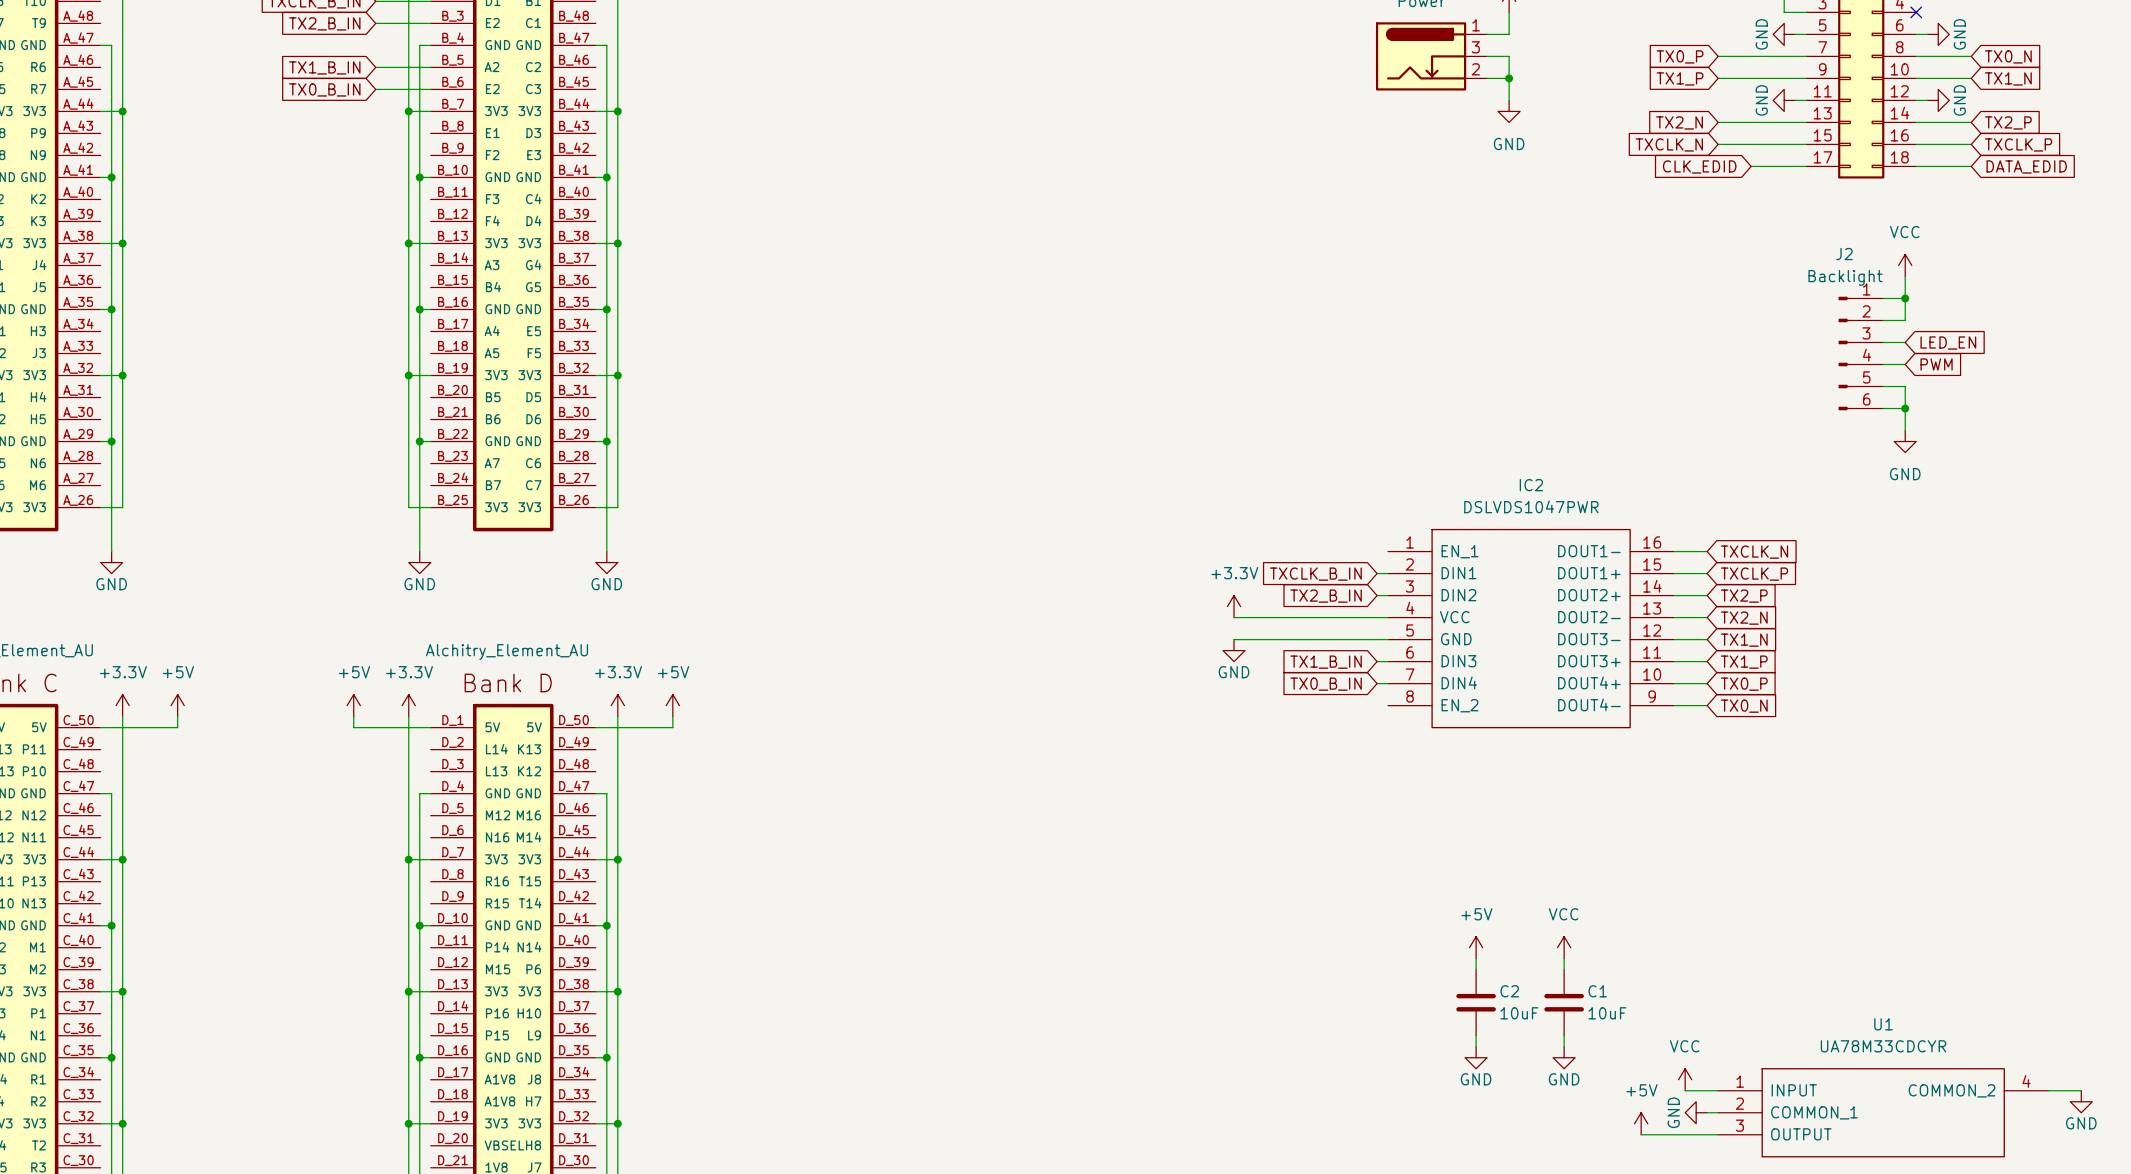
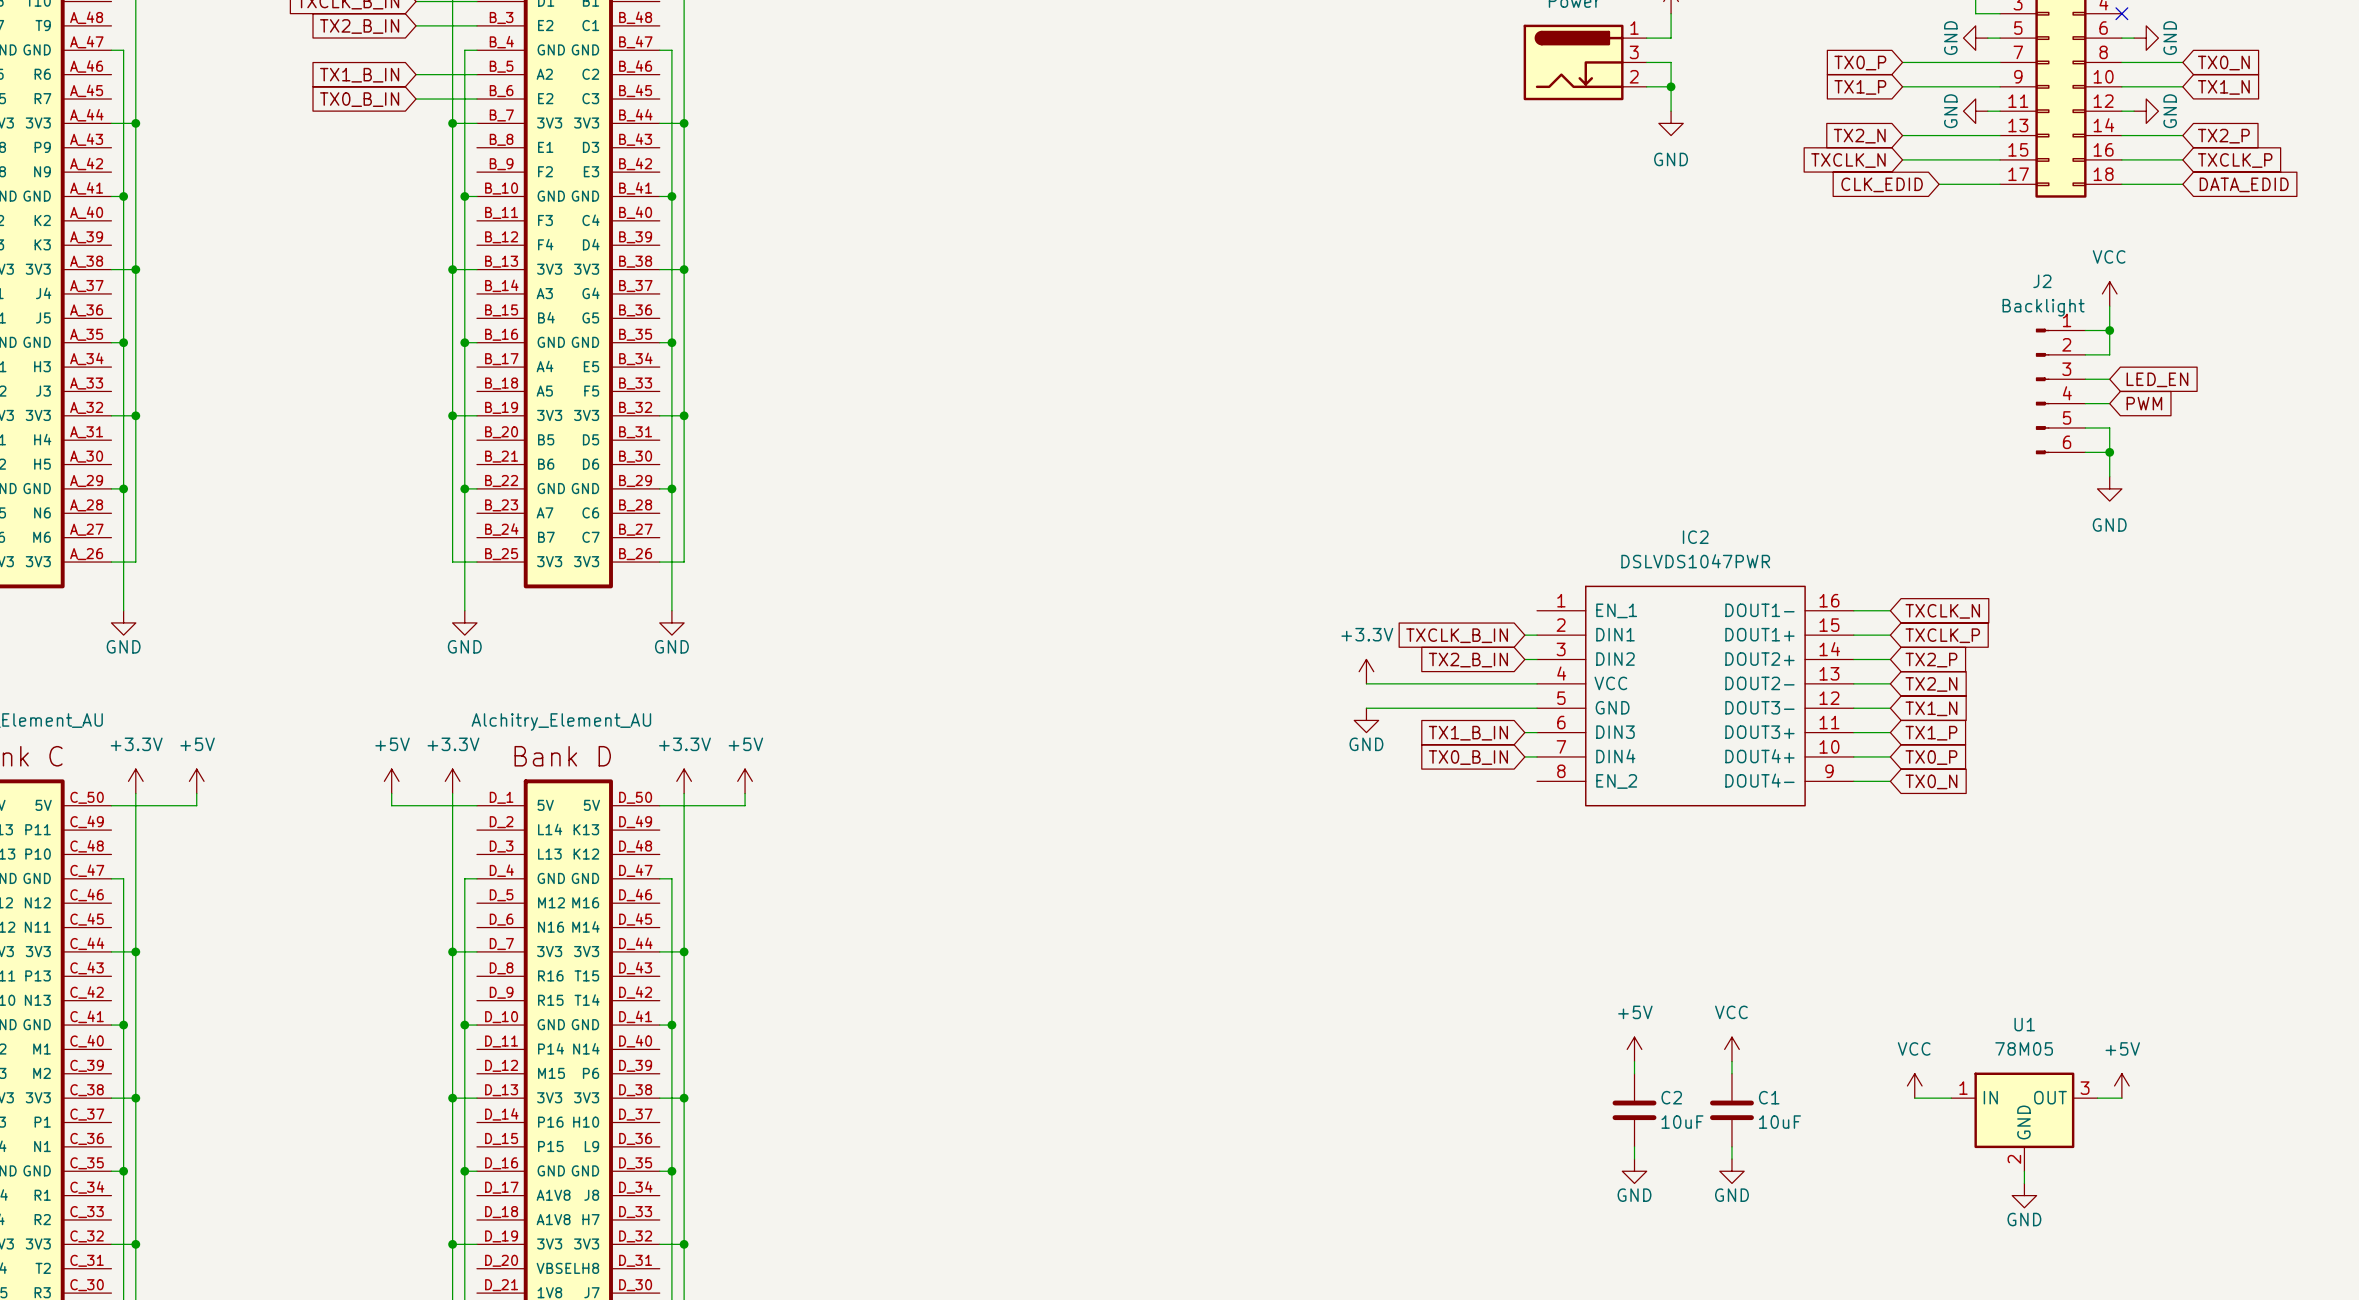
power symbol: none -> +5V (2121, 1085)
wire: none -> (2097, 1098) (2121, 1098)
U1 value: UA78M33CDCYR (1883, 1046) -> 78M05 (2024, 1048)
wire: none -> (2024, 1171) (2024, 1183)
U1 symbol: [1718, 1068, 2049, 1158] -> [1951, 1072, 2098, 1172]
power symbol position: VCC (1685, 1079) -> VCC (1914, 1085)
power symbol: none -> GND (2024, 1195)
wire: (1685, 1090) (1718, 1090) -> (1914, 1098) (1951, 1098)
wire: (2048, 1090) (2081, 1090) -> none
power symbol: GND (2081, 1101) -> none
power symbol: GND (1696, 1112) -> none
wire: (1707, 1112) (1718, 1112) -> none
power symbol: +5V (1641, 1123) -> none
wire: (1641, 1134) (1718, 1134) -> none

